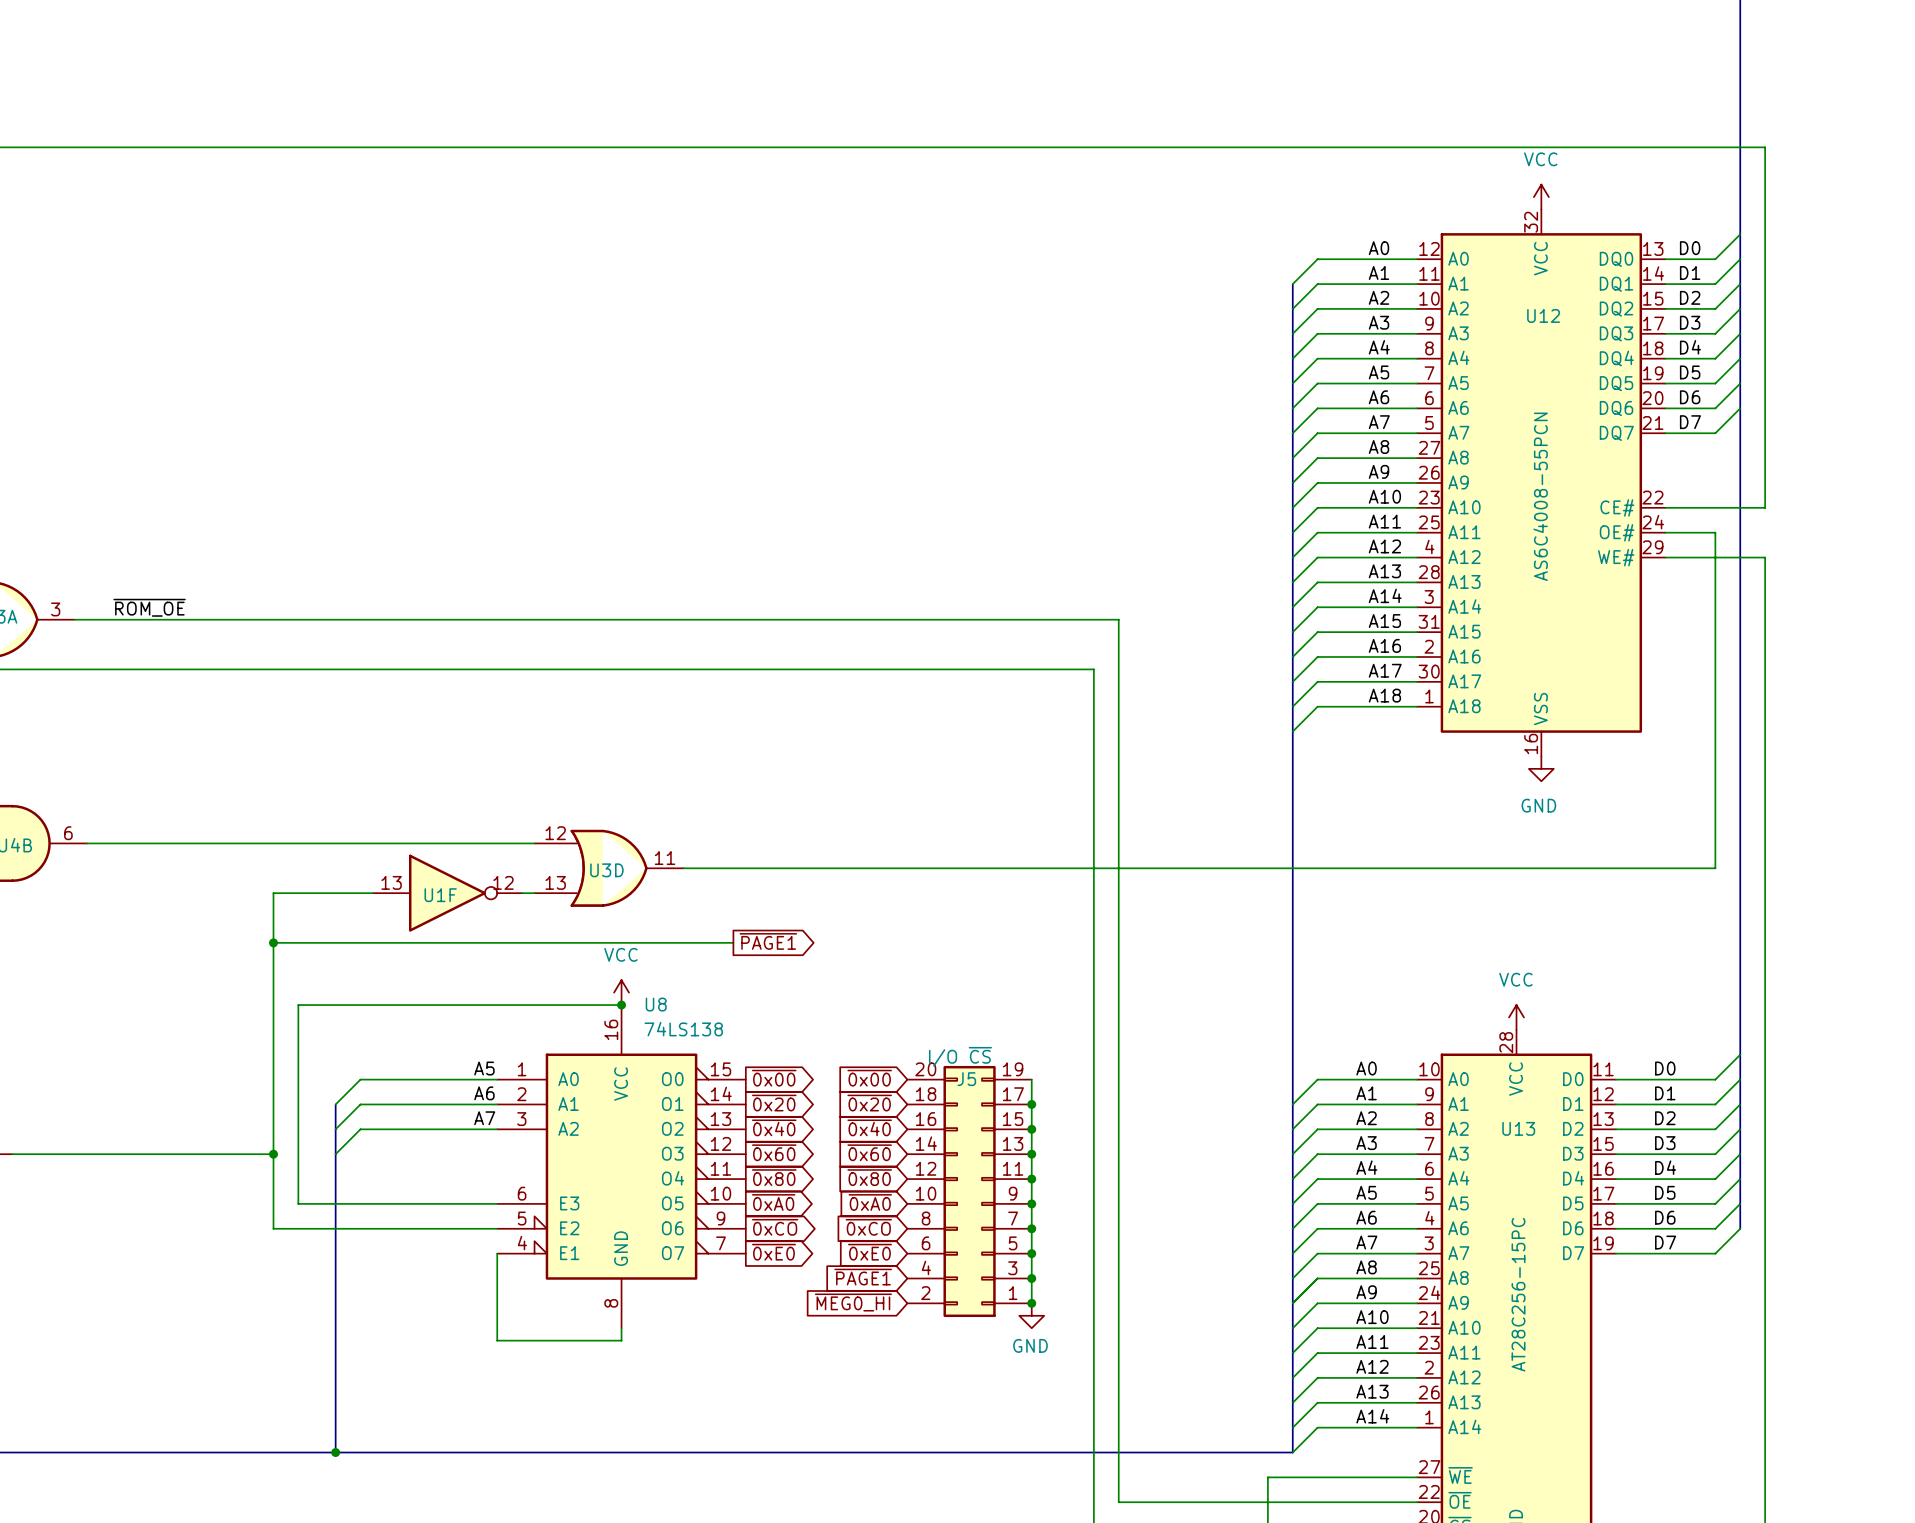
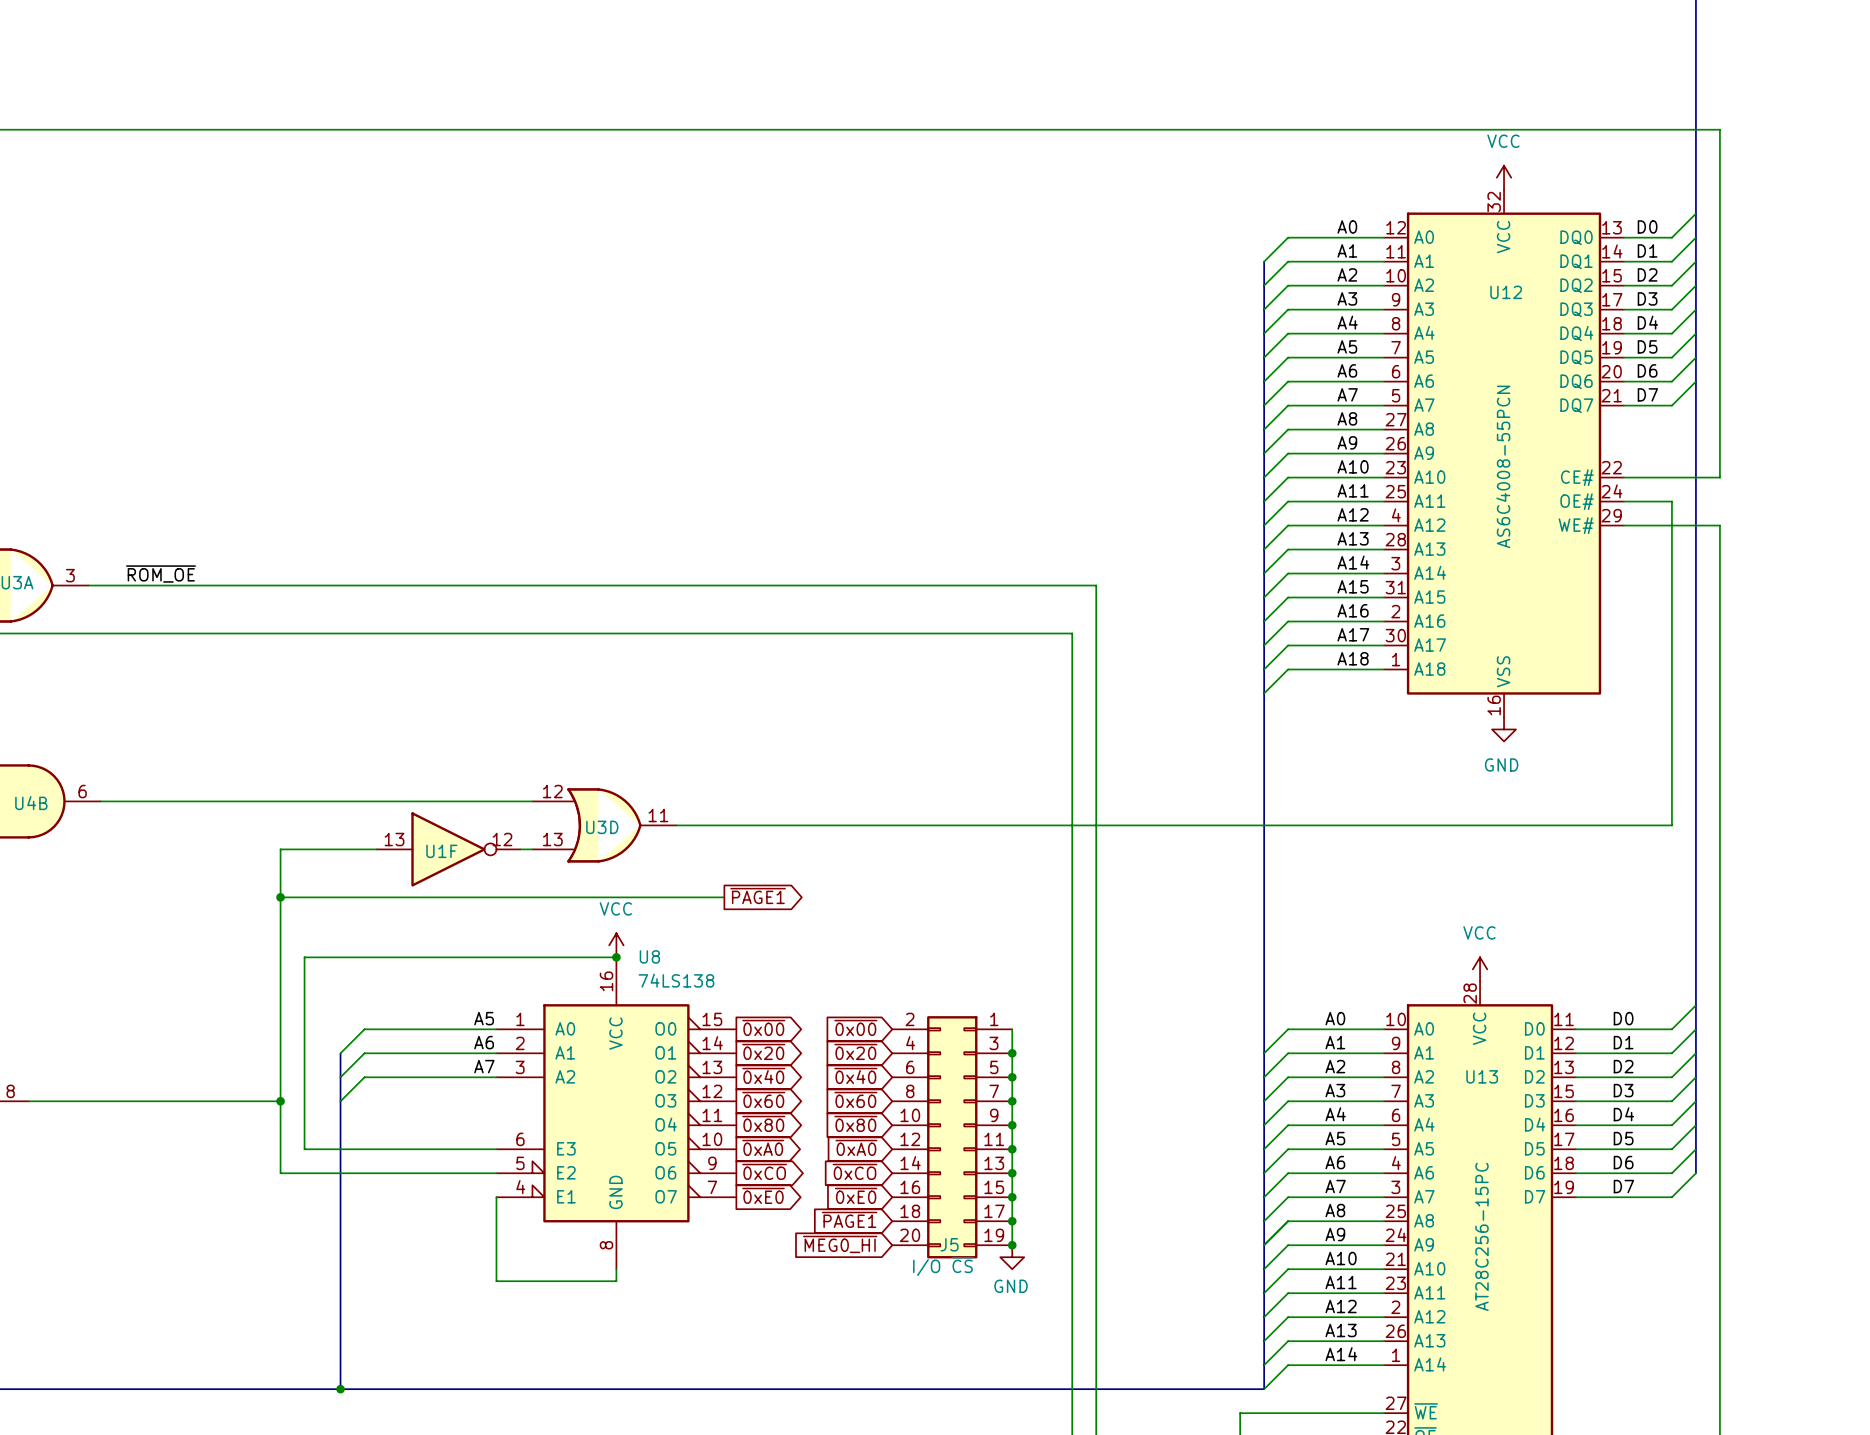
J5 flip: as is (969, 1191) -> up-down (952, 1137)

